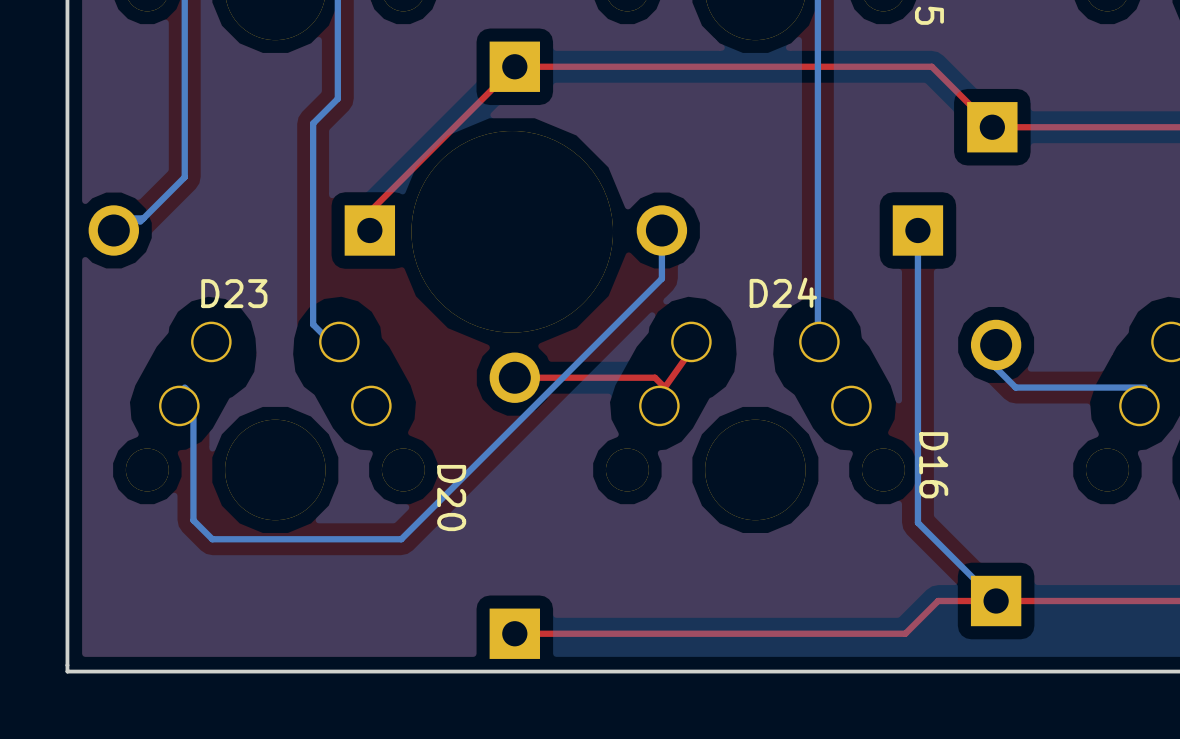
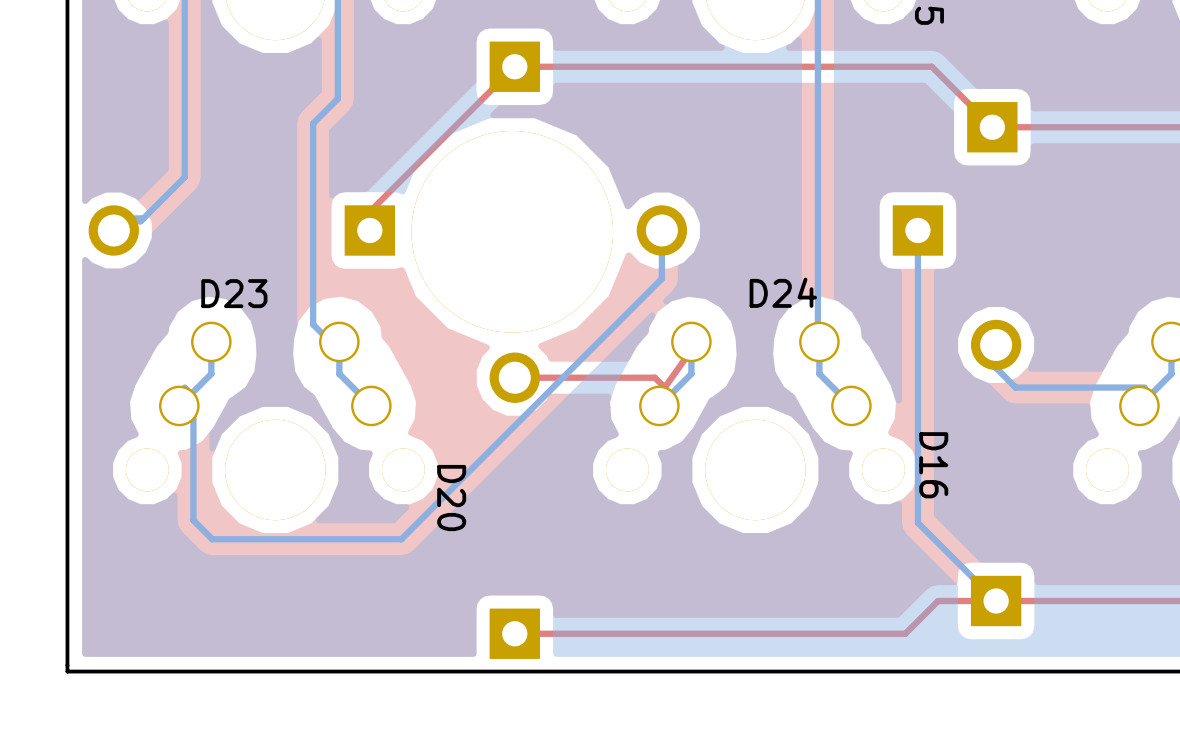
bottom track: none -> (211, 341) (211, 373) (179, 405)
bottom track: none -> (339, 341) (339, 373) (371, 405)
bottom track: none -> (691, 341) (691, 373) (659, 405)
bottom track: none -> (819, 341) (819, 373) (851, 405)
bottom track: none -> (1171, 341) (1171, 373) (1139, 405)

